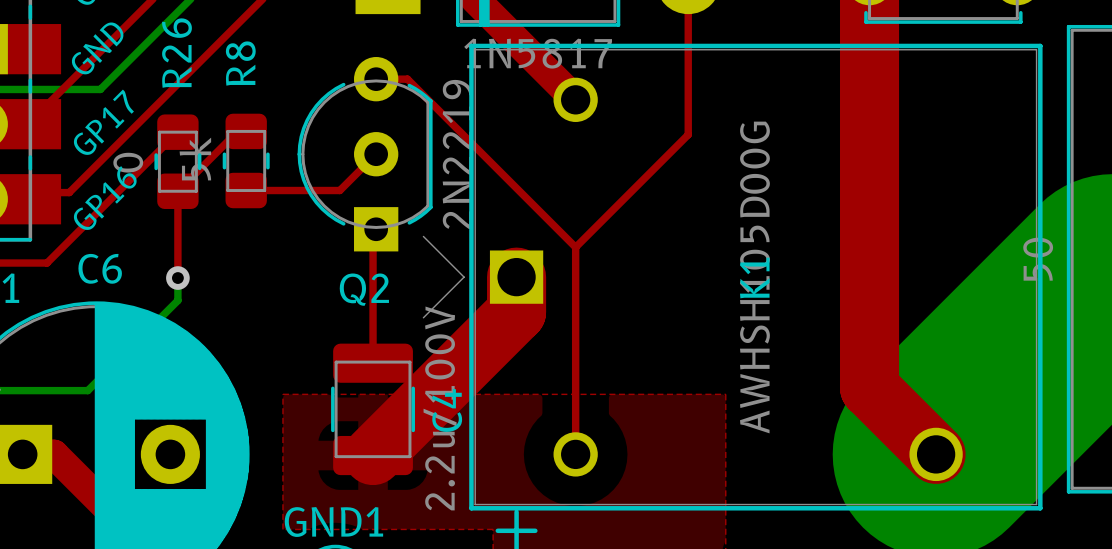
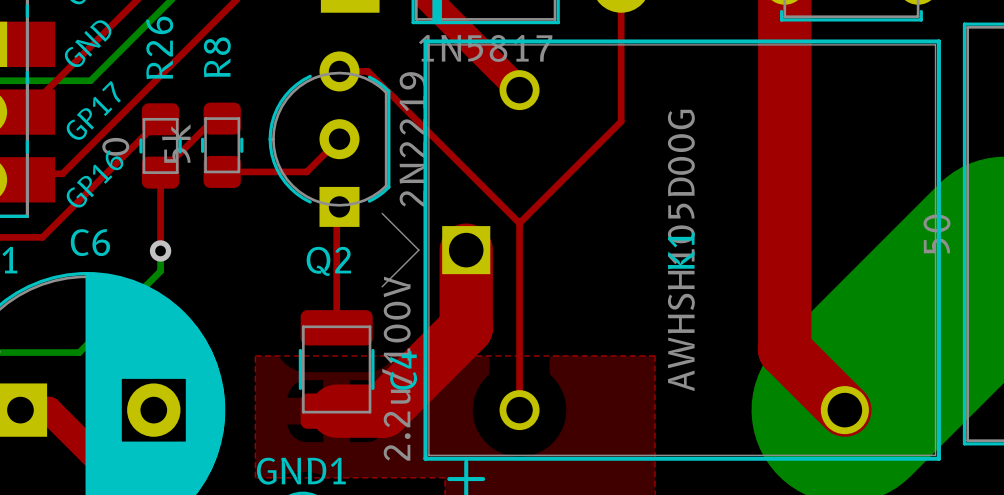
top track: (516, 312) (373, 455) -> (466, 281) (466, 327) (383, 411) (336, 411)

